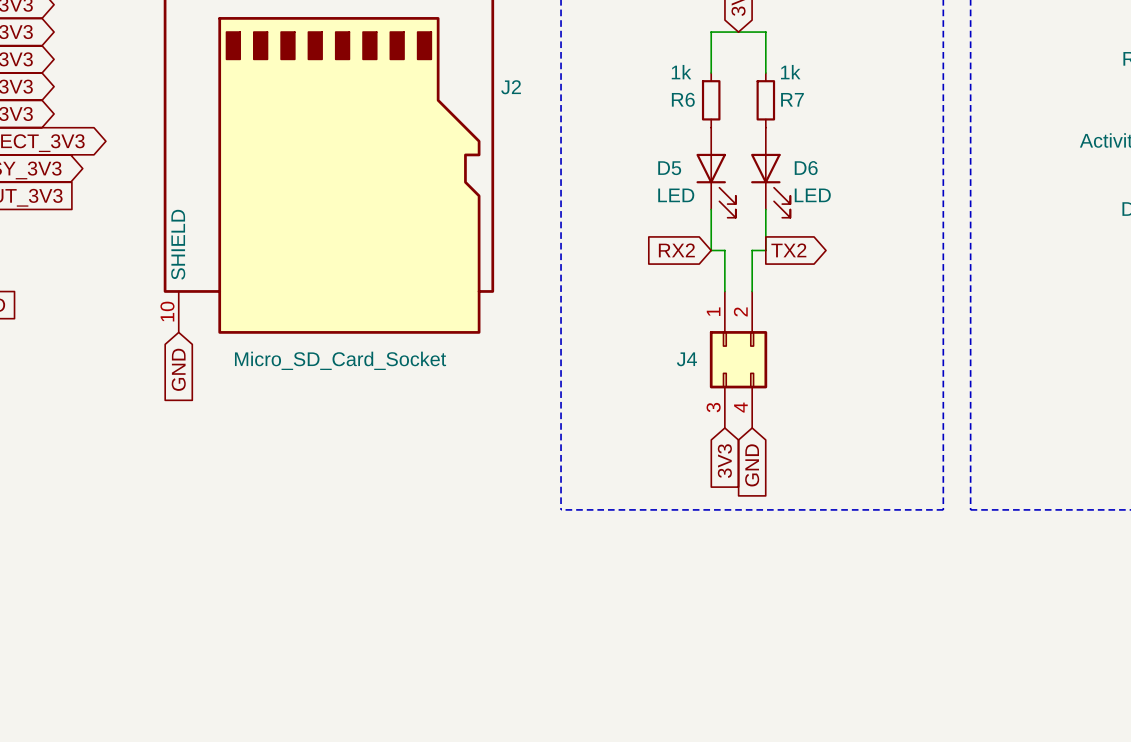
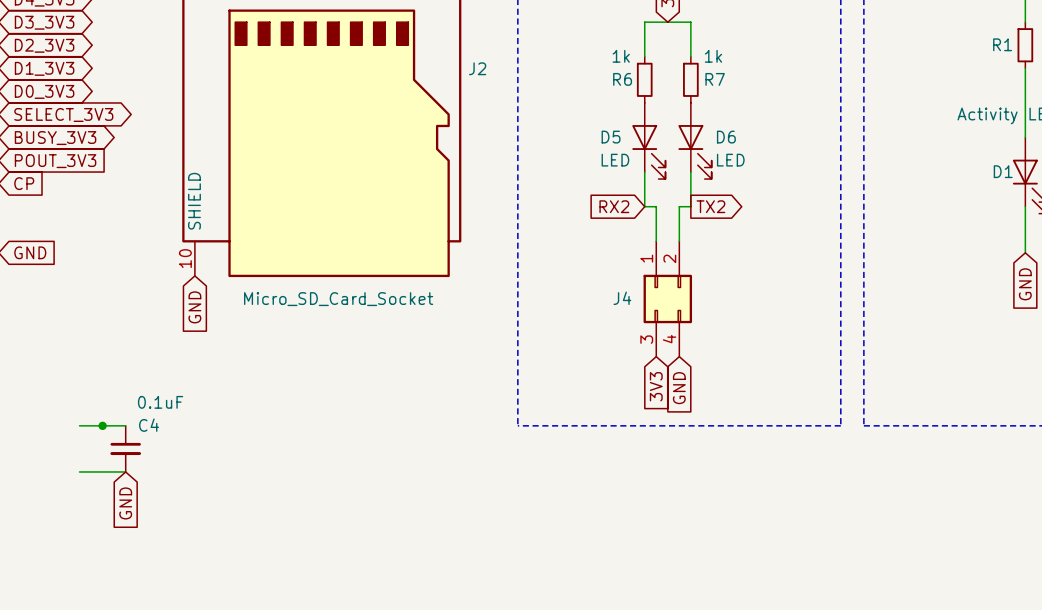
wire: none -> (79, 425) (125, 425)
junction: none -> (102, 425)
C4: none -> 0.1uF (125, 448)
wire: none -> (79, 471) (125, 471)
global label: none -> GND (125, 503)

